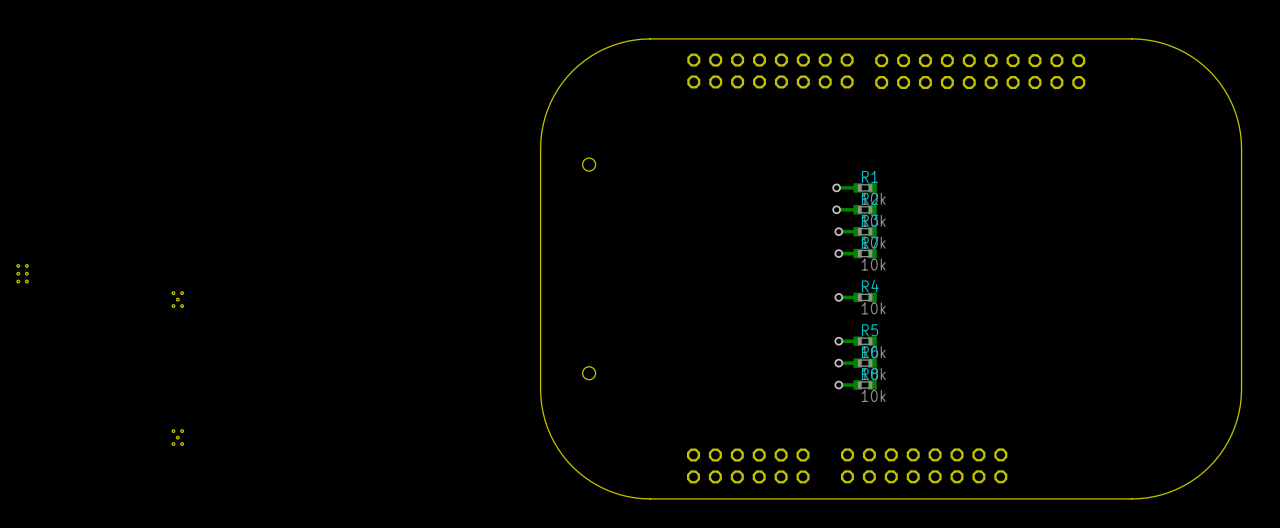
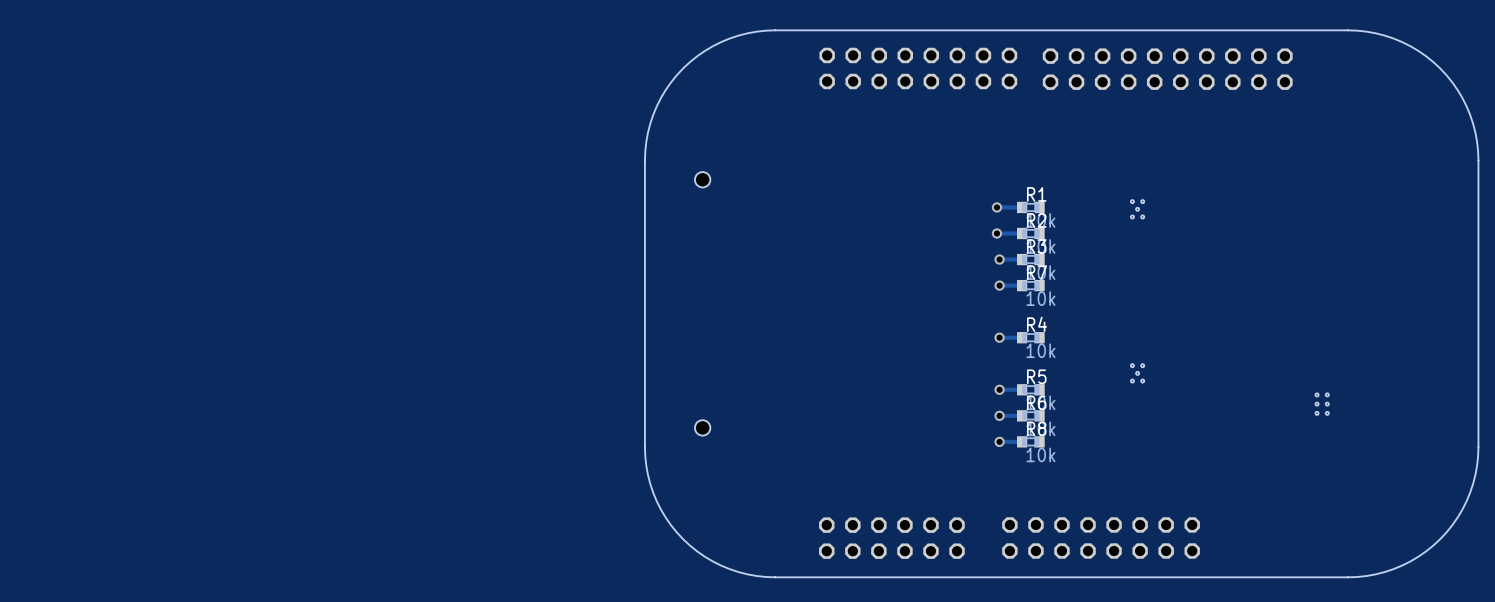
part: none -> (1137, 209)
part: (22, 273) -> none
part: (177, 299) -> none
part: none -> (1137, 373)
part: none -> (1322, 404)
part: (177, 437) -> none

